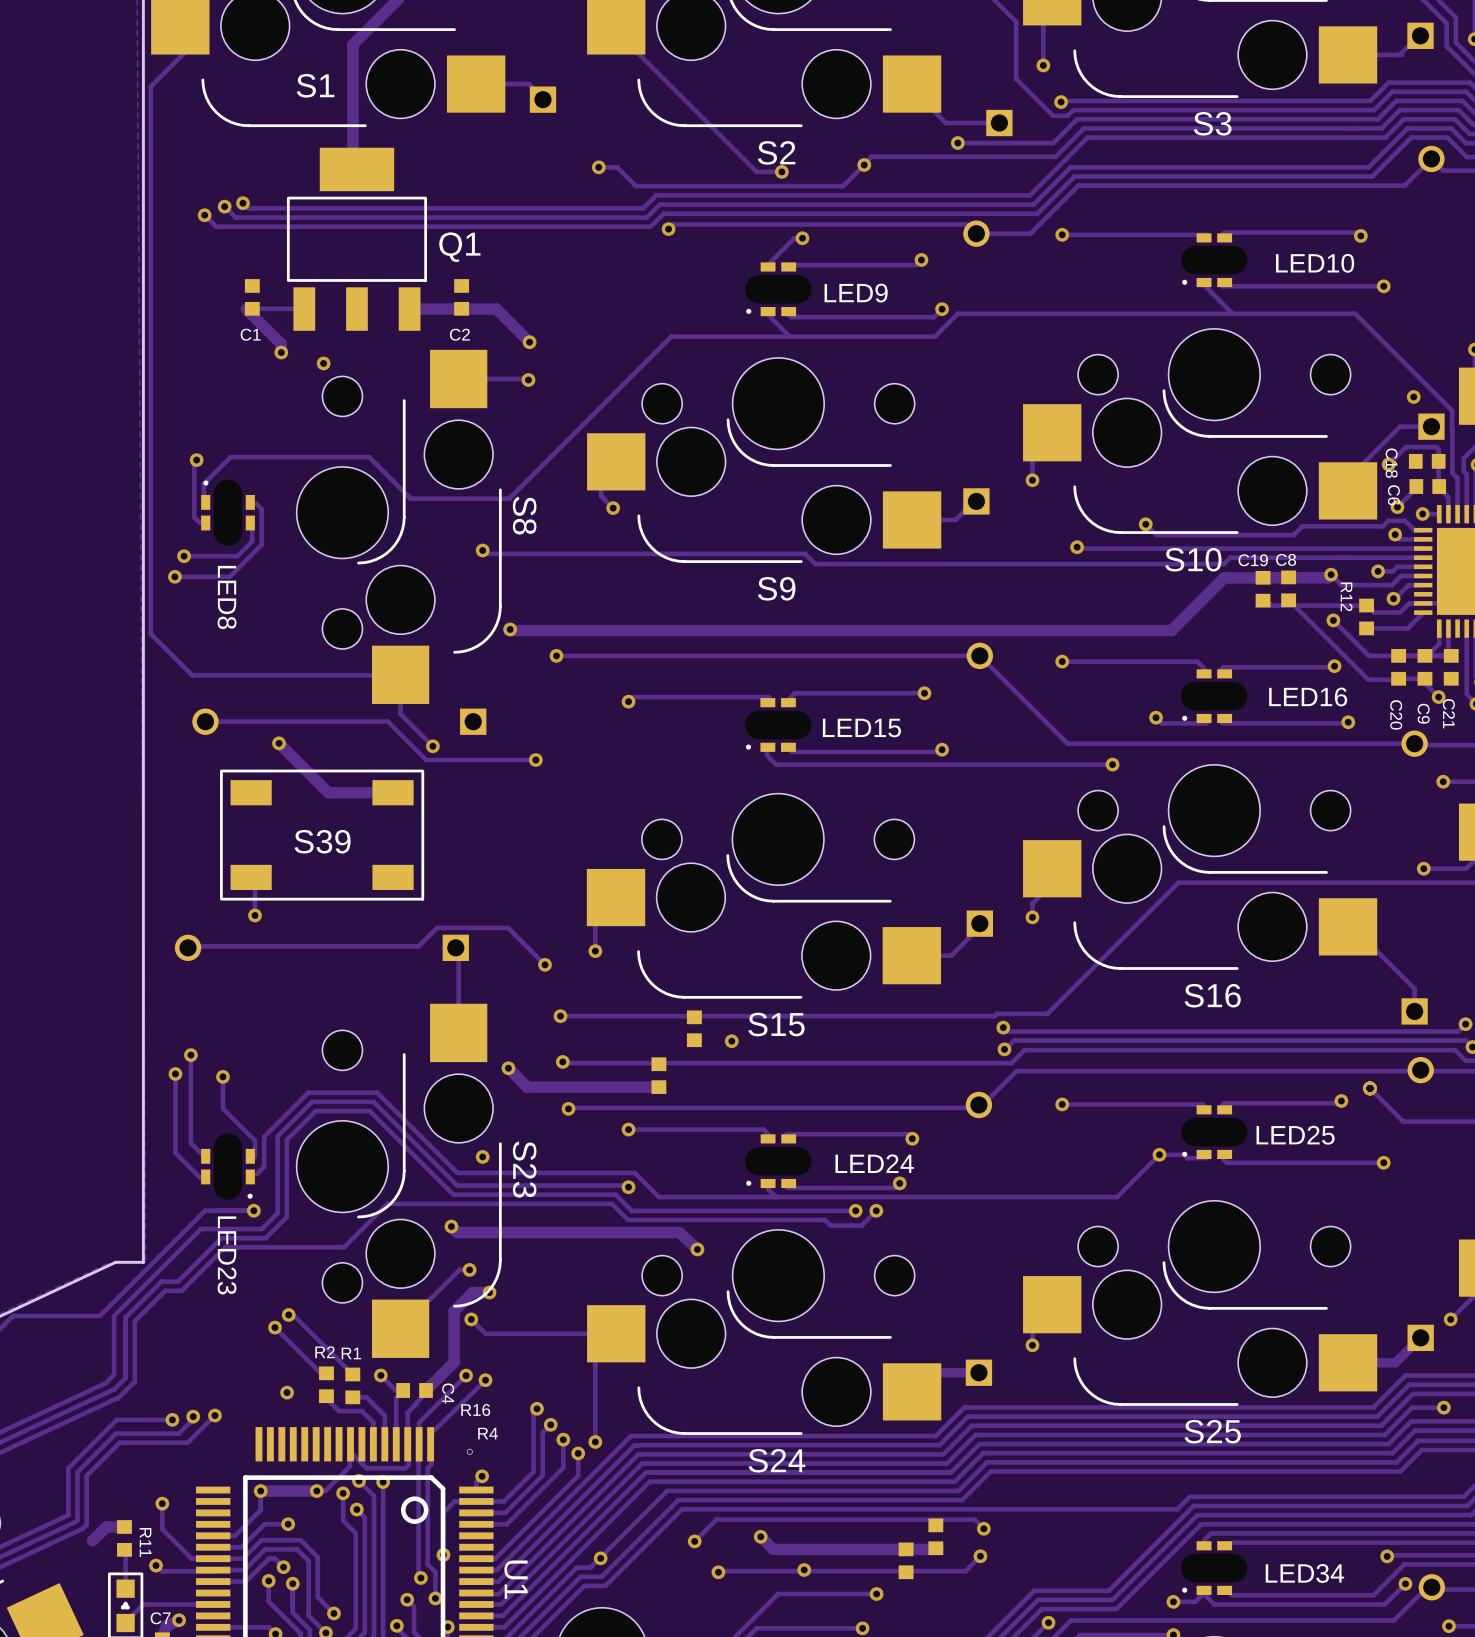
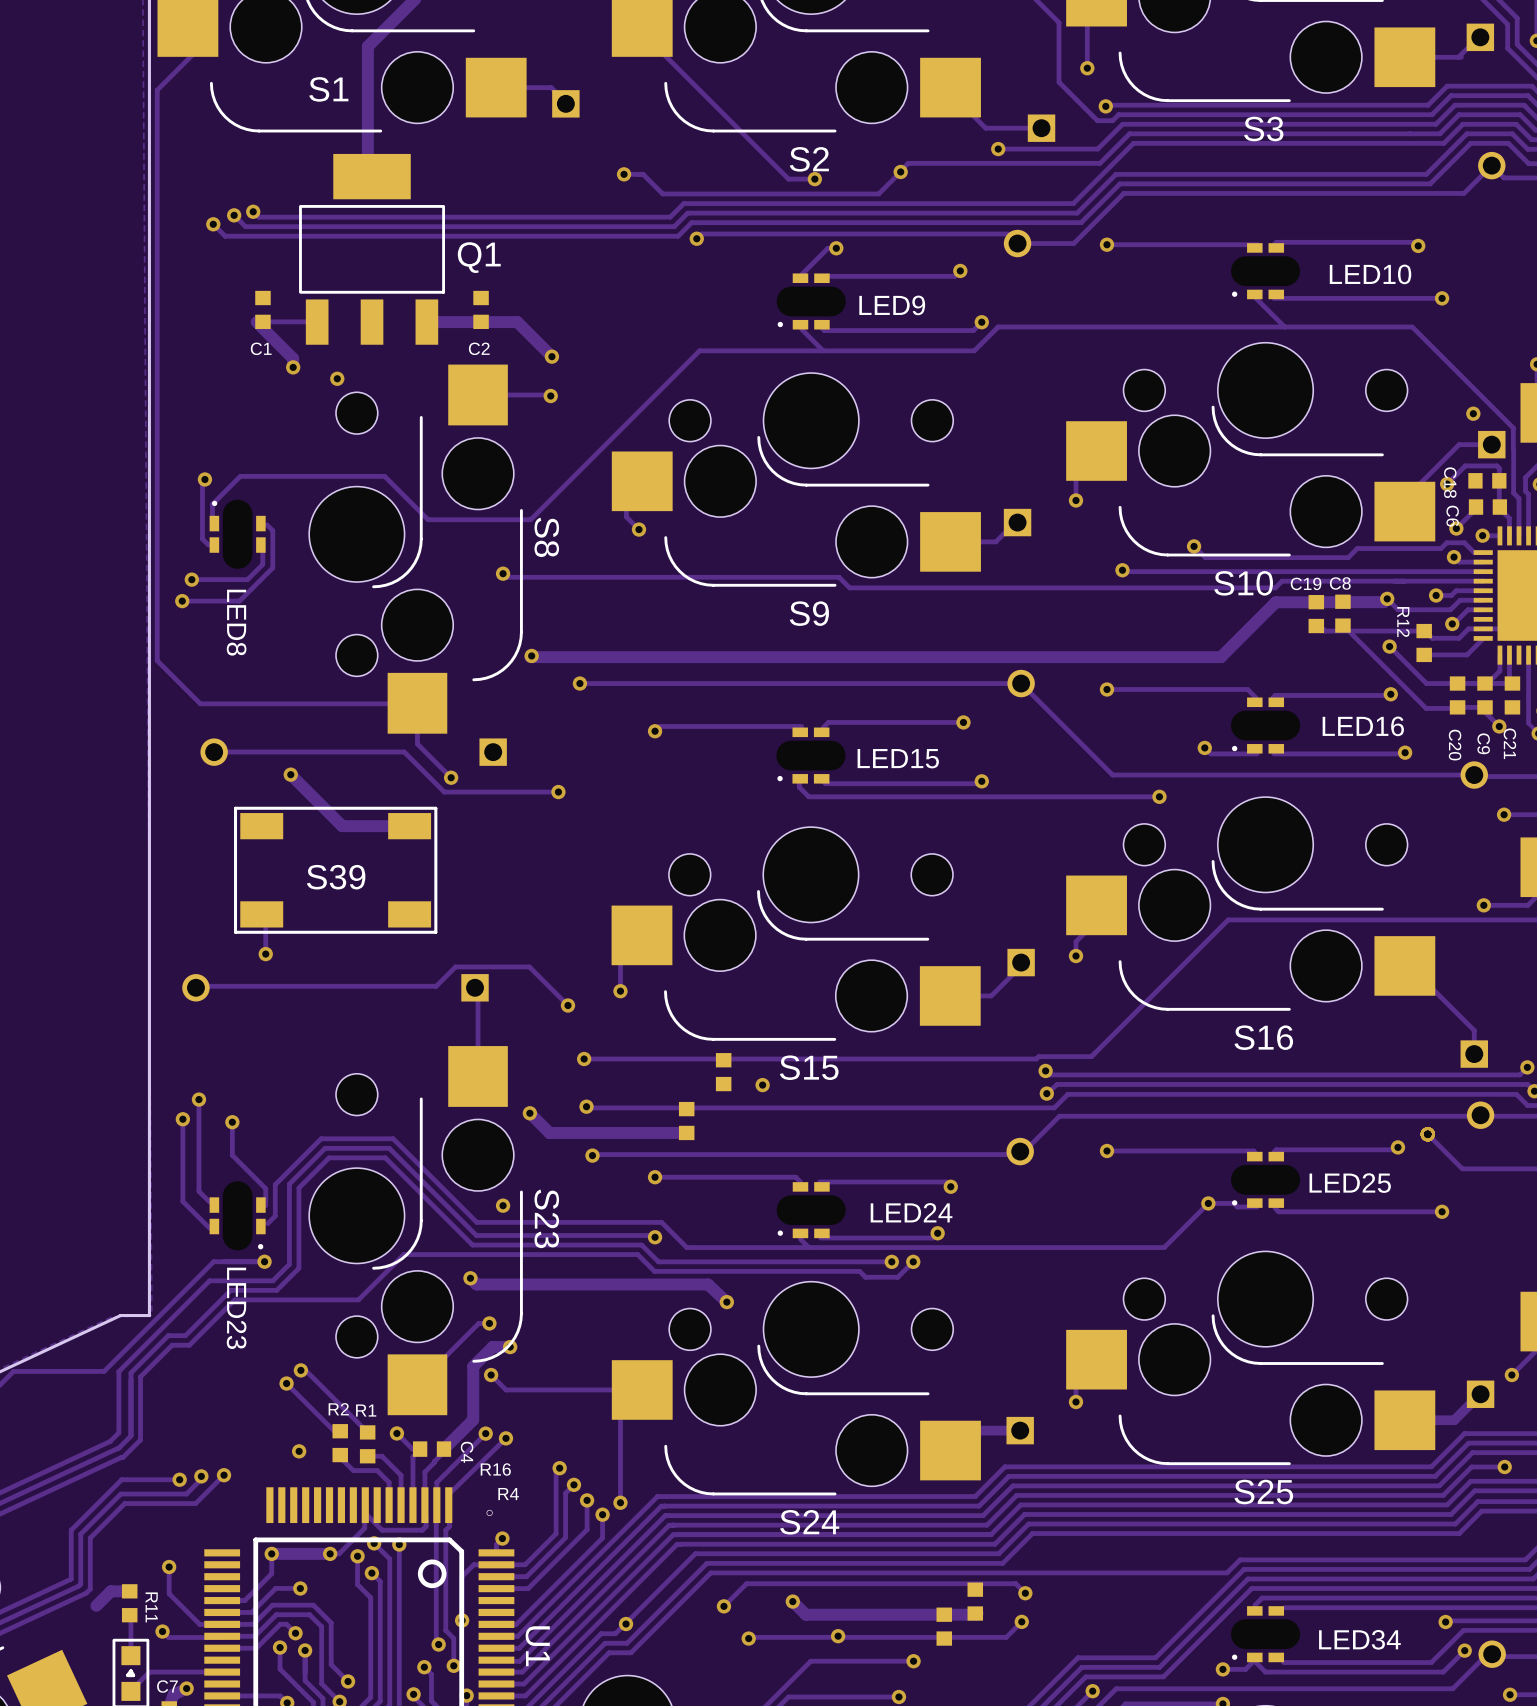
S39 footprint: [220, 769, 425, 901] -> [233, 806, 438, 934]

